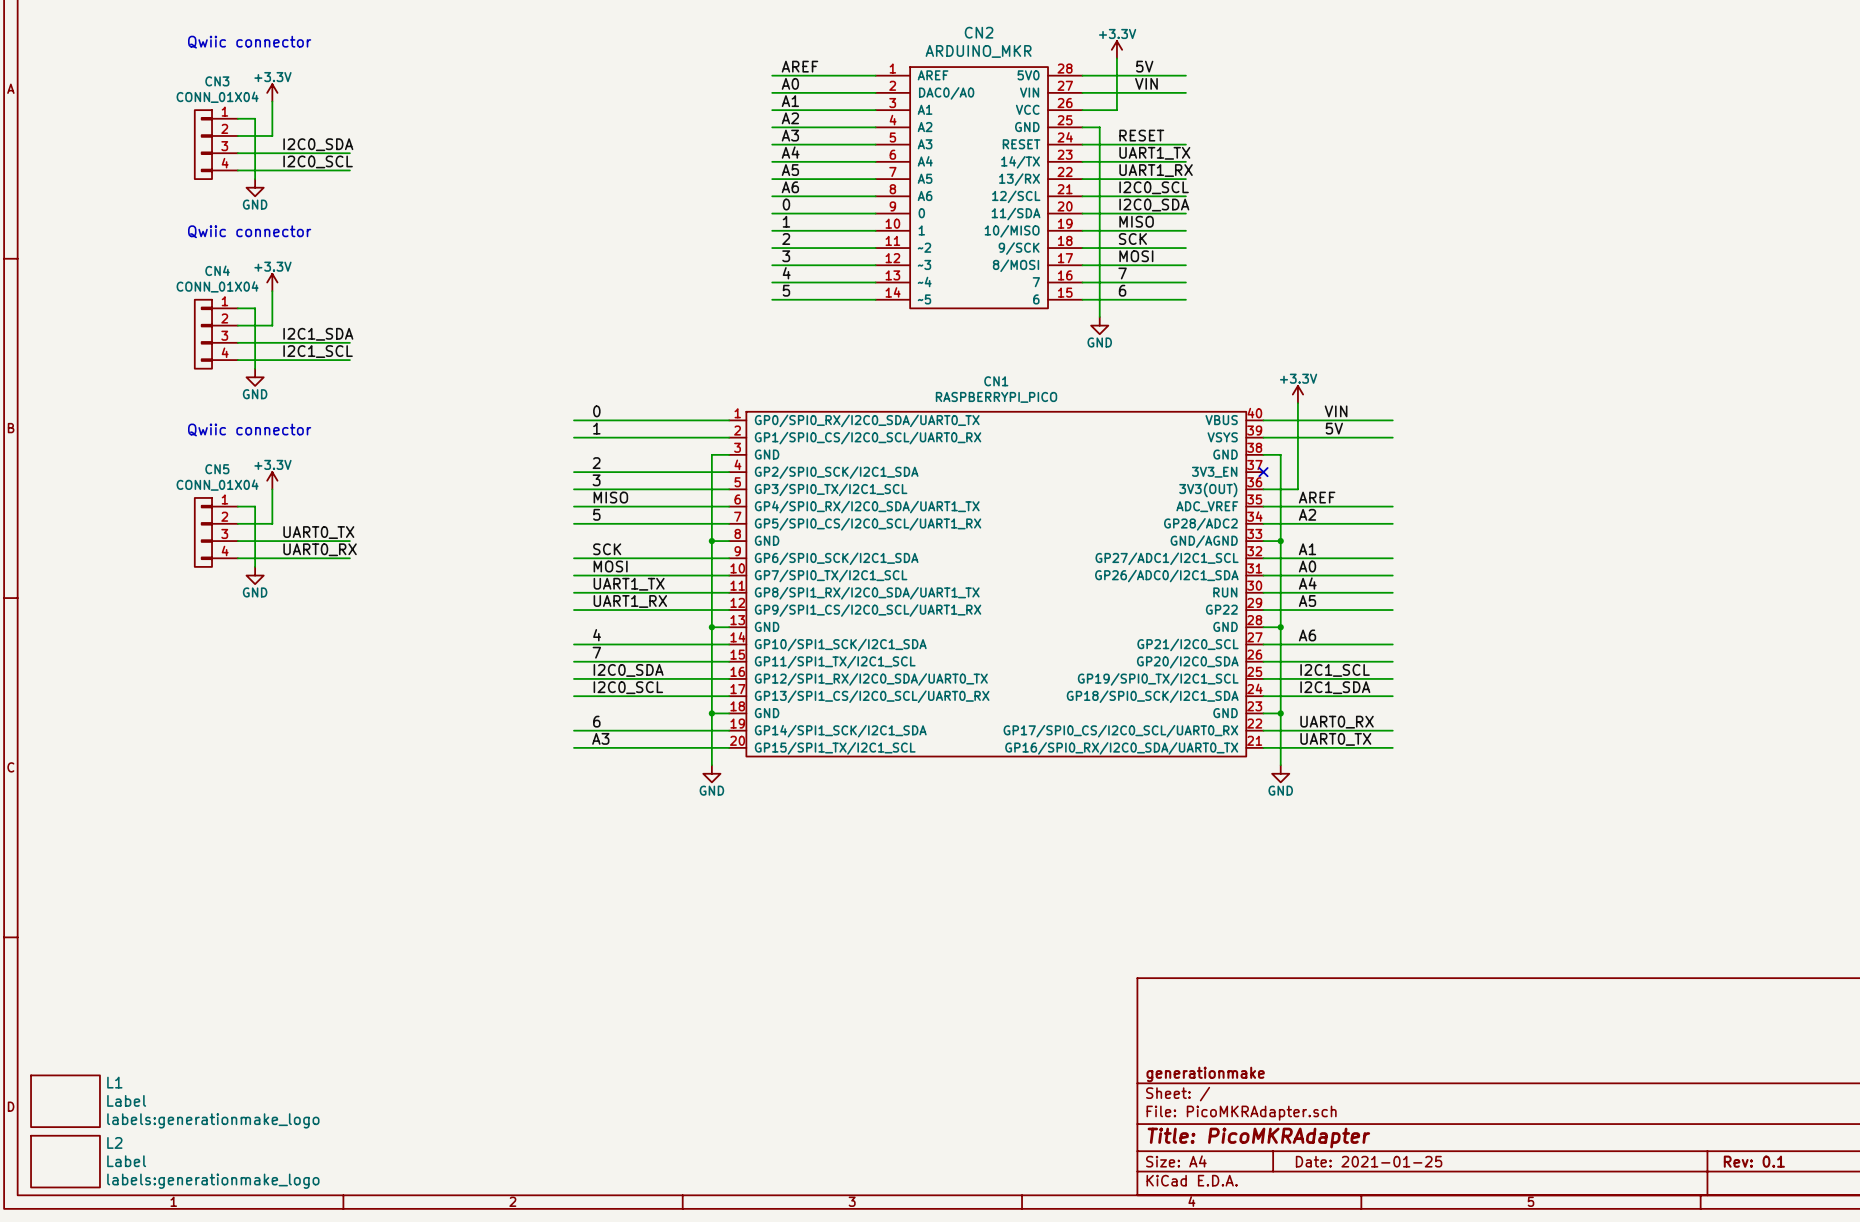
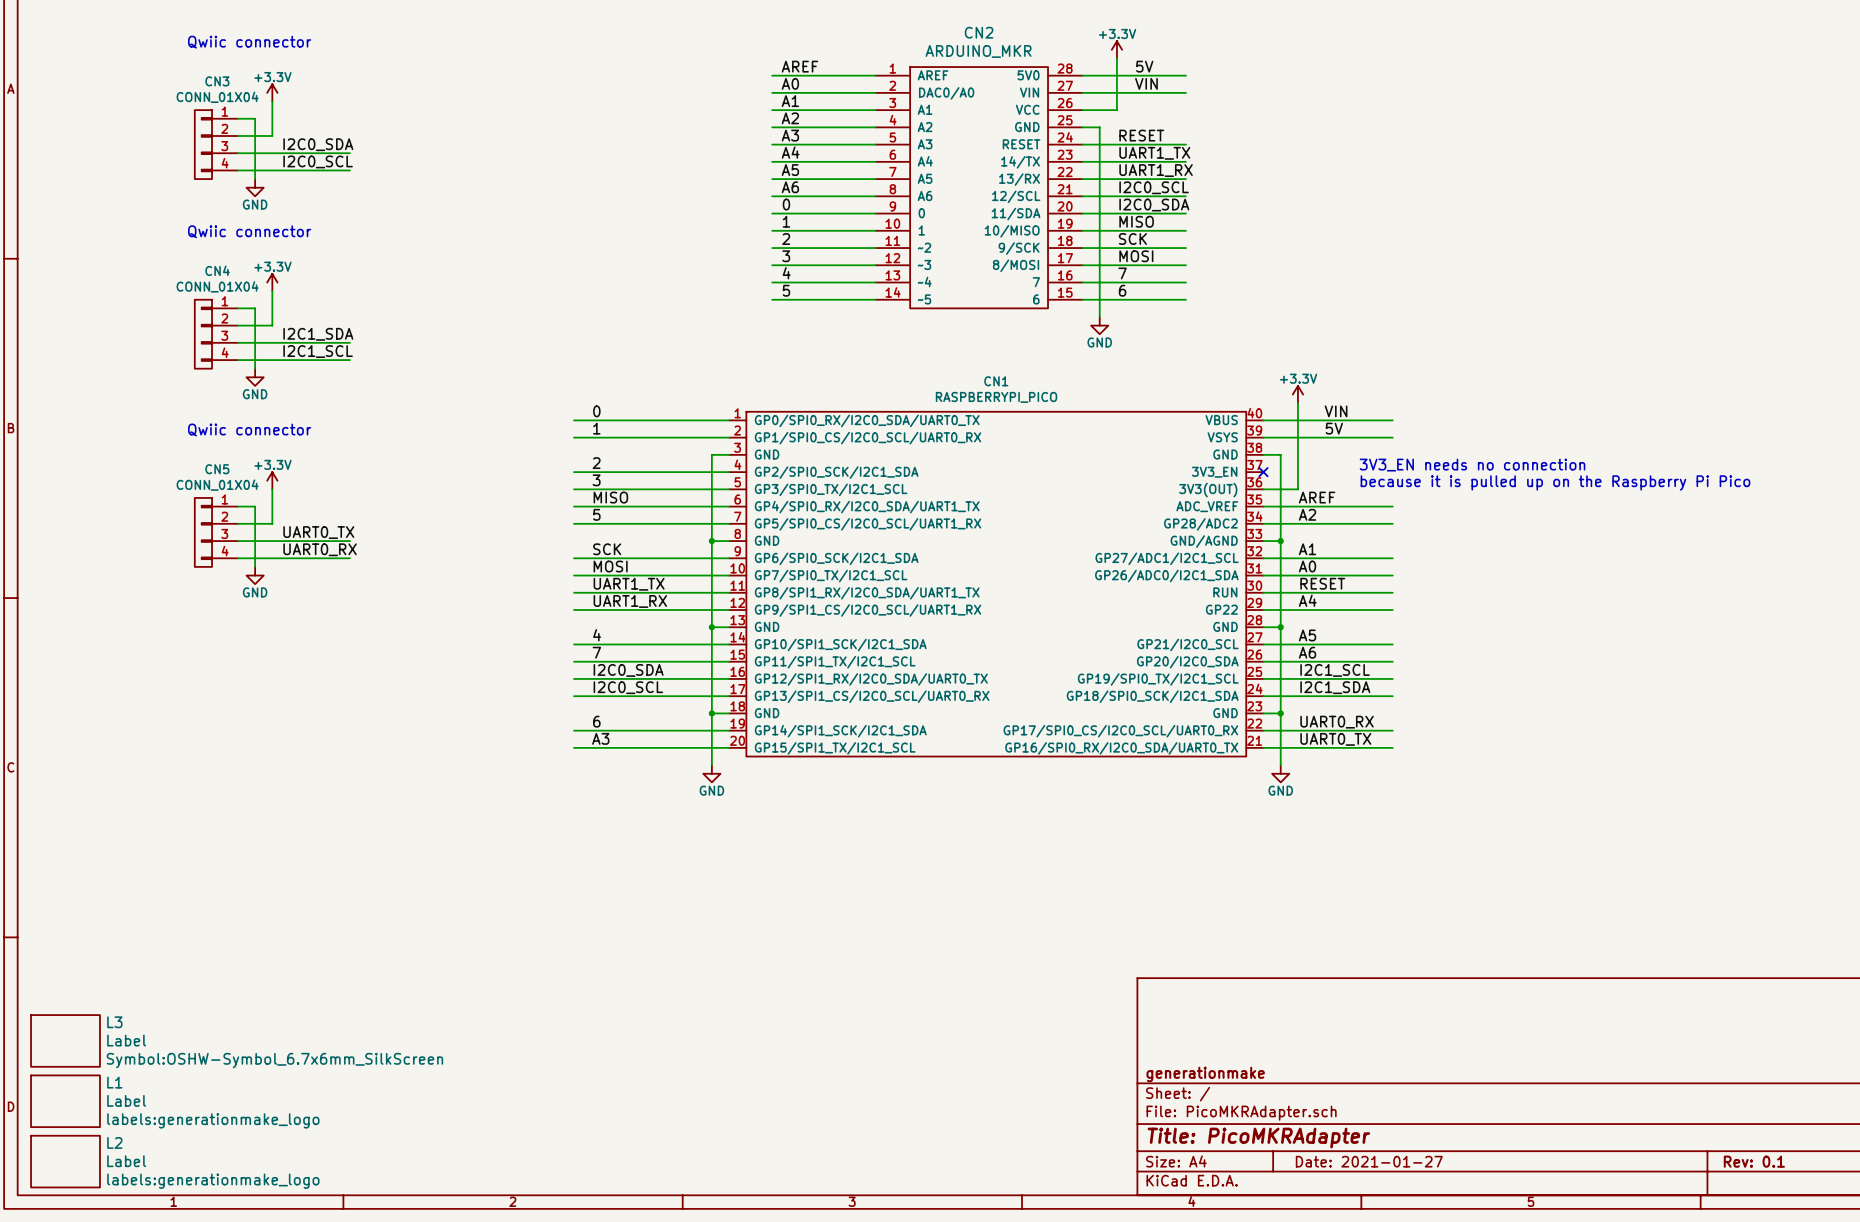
text: none -> 3V3_EN needs no connection (1472, 465)
text: none -> because it is pulled up on the Raspberry Pi Pico (1555, 482)
label: A4 (1307, 583) -> RESET (1322, 583)
label: A5 (1307, 600) -> A4 (1307, 600)
label: A6 (1307, 635) -> A5 (1307, 635)
label: none -> A6 (1307, 652)
L3: none -> Label (65, 1040)
title block: Date: 2021-01-25 (1369, 1161) -> Date: 2021-01-27 (1369, 1161)

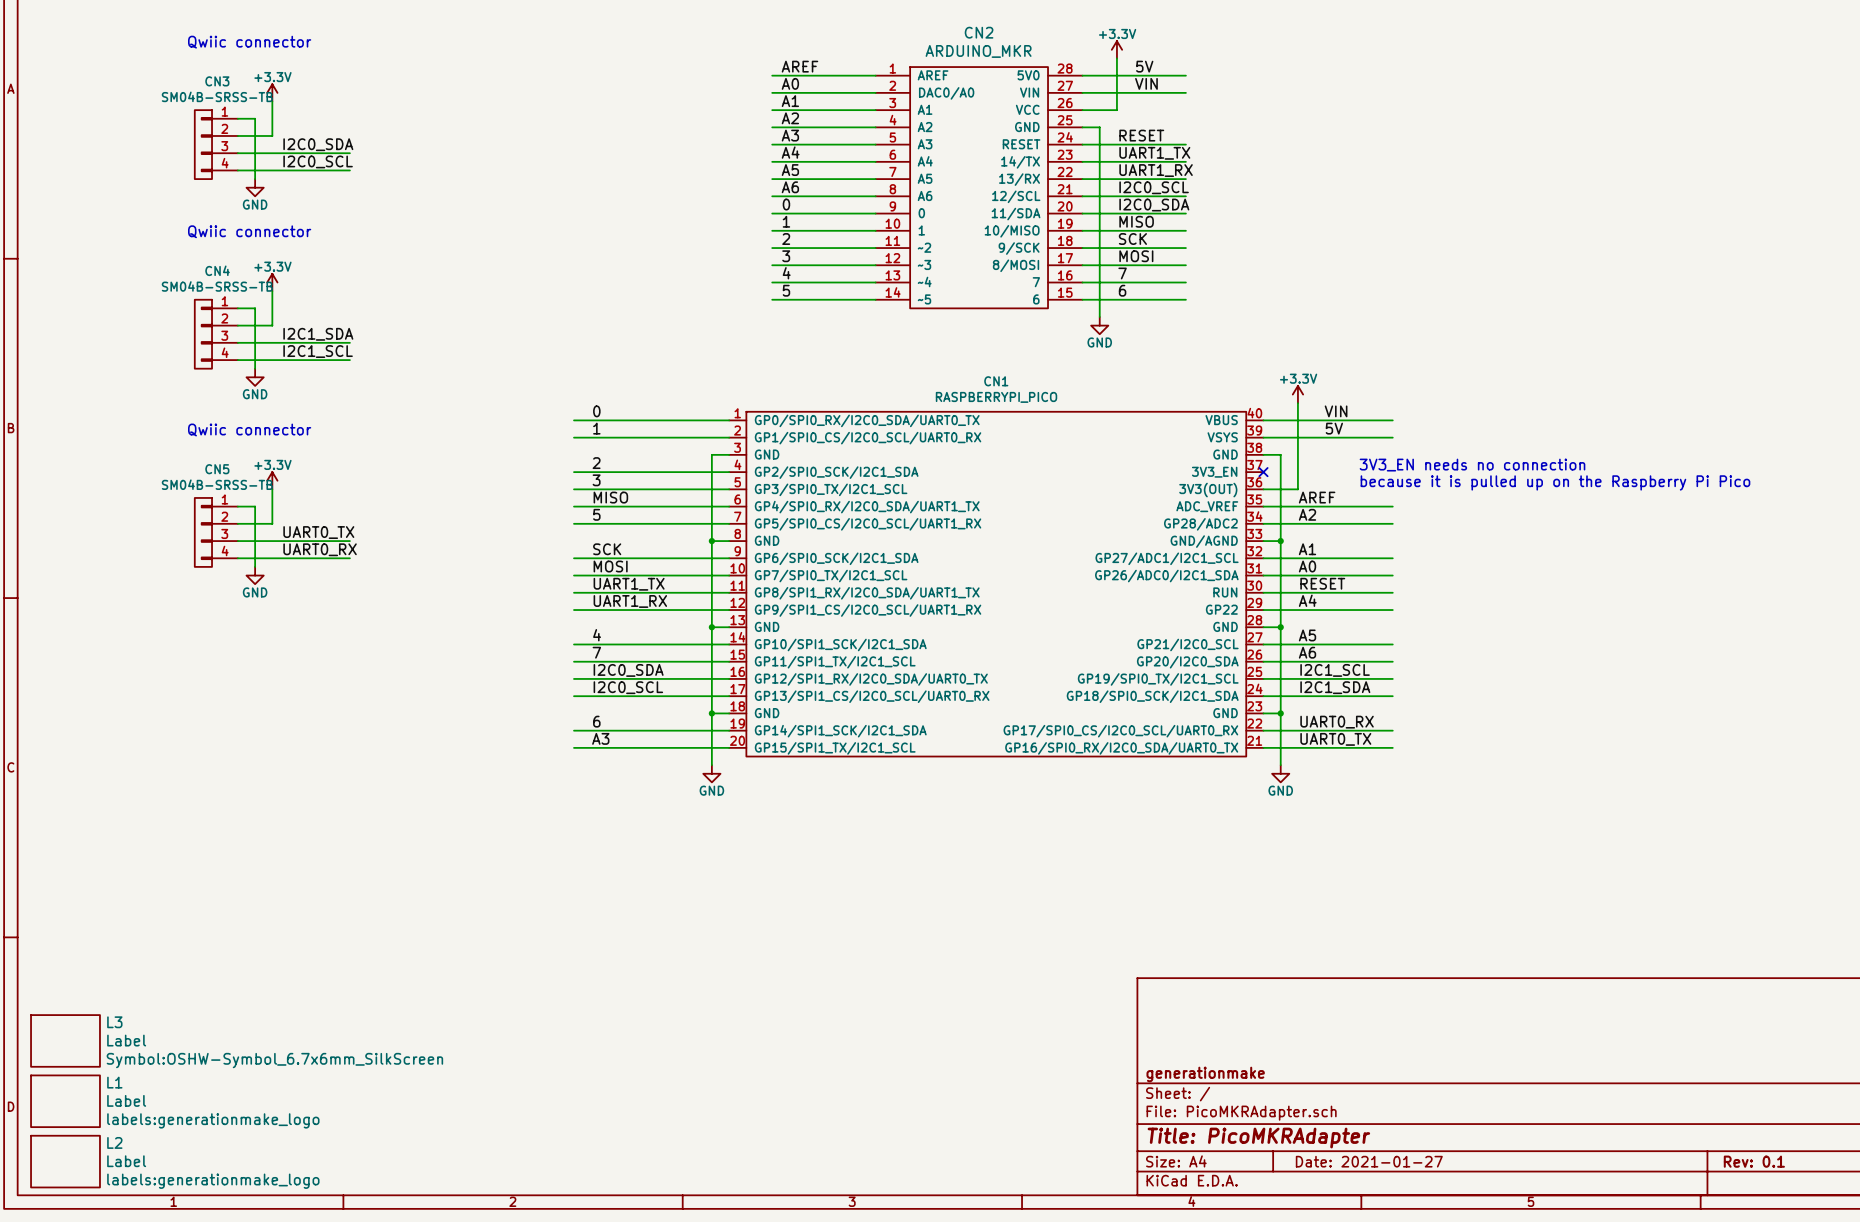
CN3 value: CONN_01X04 (217, 97) -> SM04B-SRSS-TB (217, 96)
CN4 value: CONN_01X04 (217, 286) -> SM04B-SRSS-TB (217, 286)
CN5 value: CONN_01X04 (217, 485) -> SM04B-SRSS-TB (217, 484)

